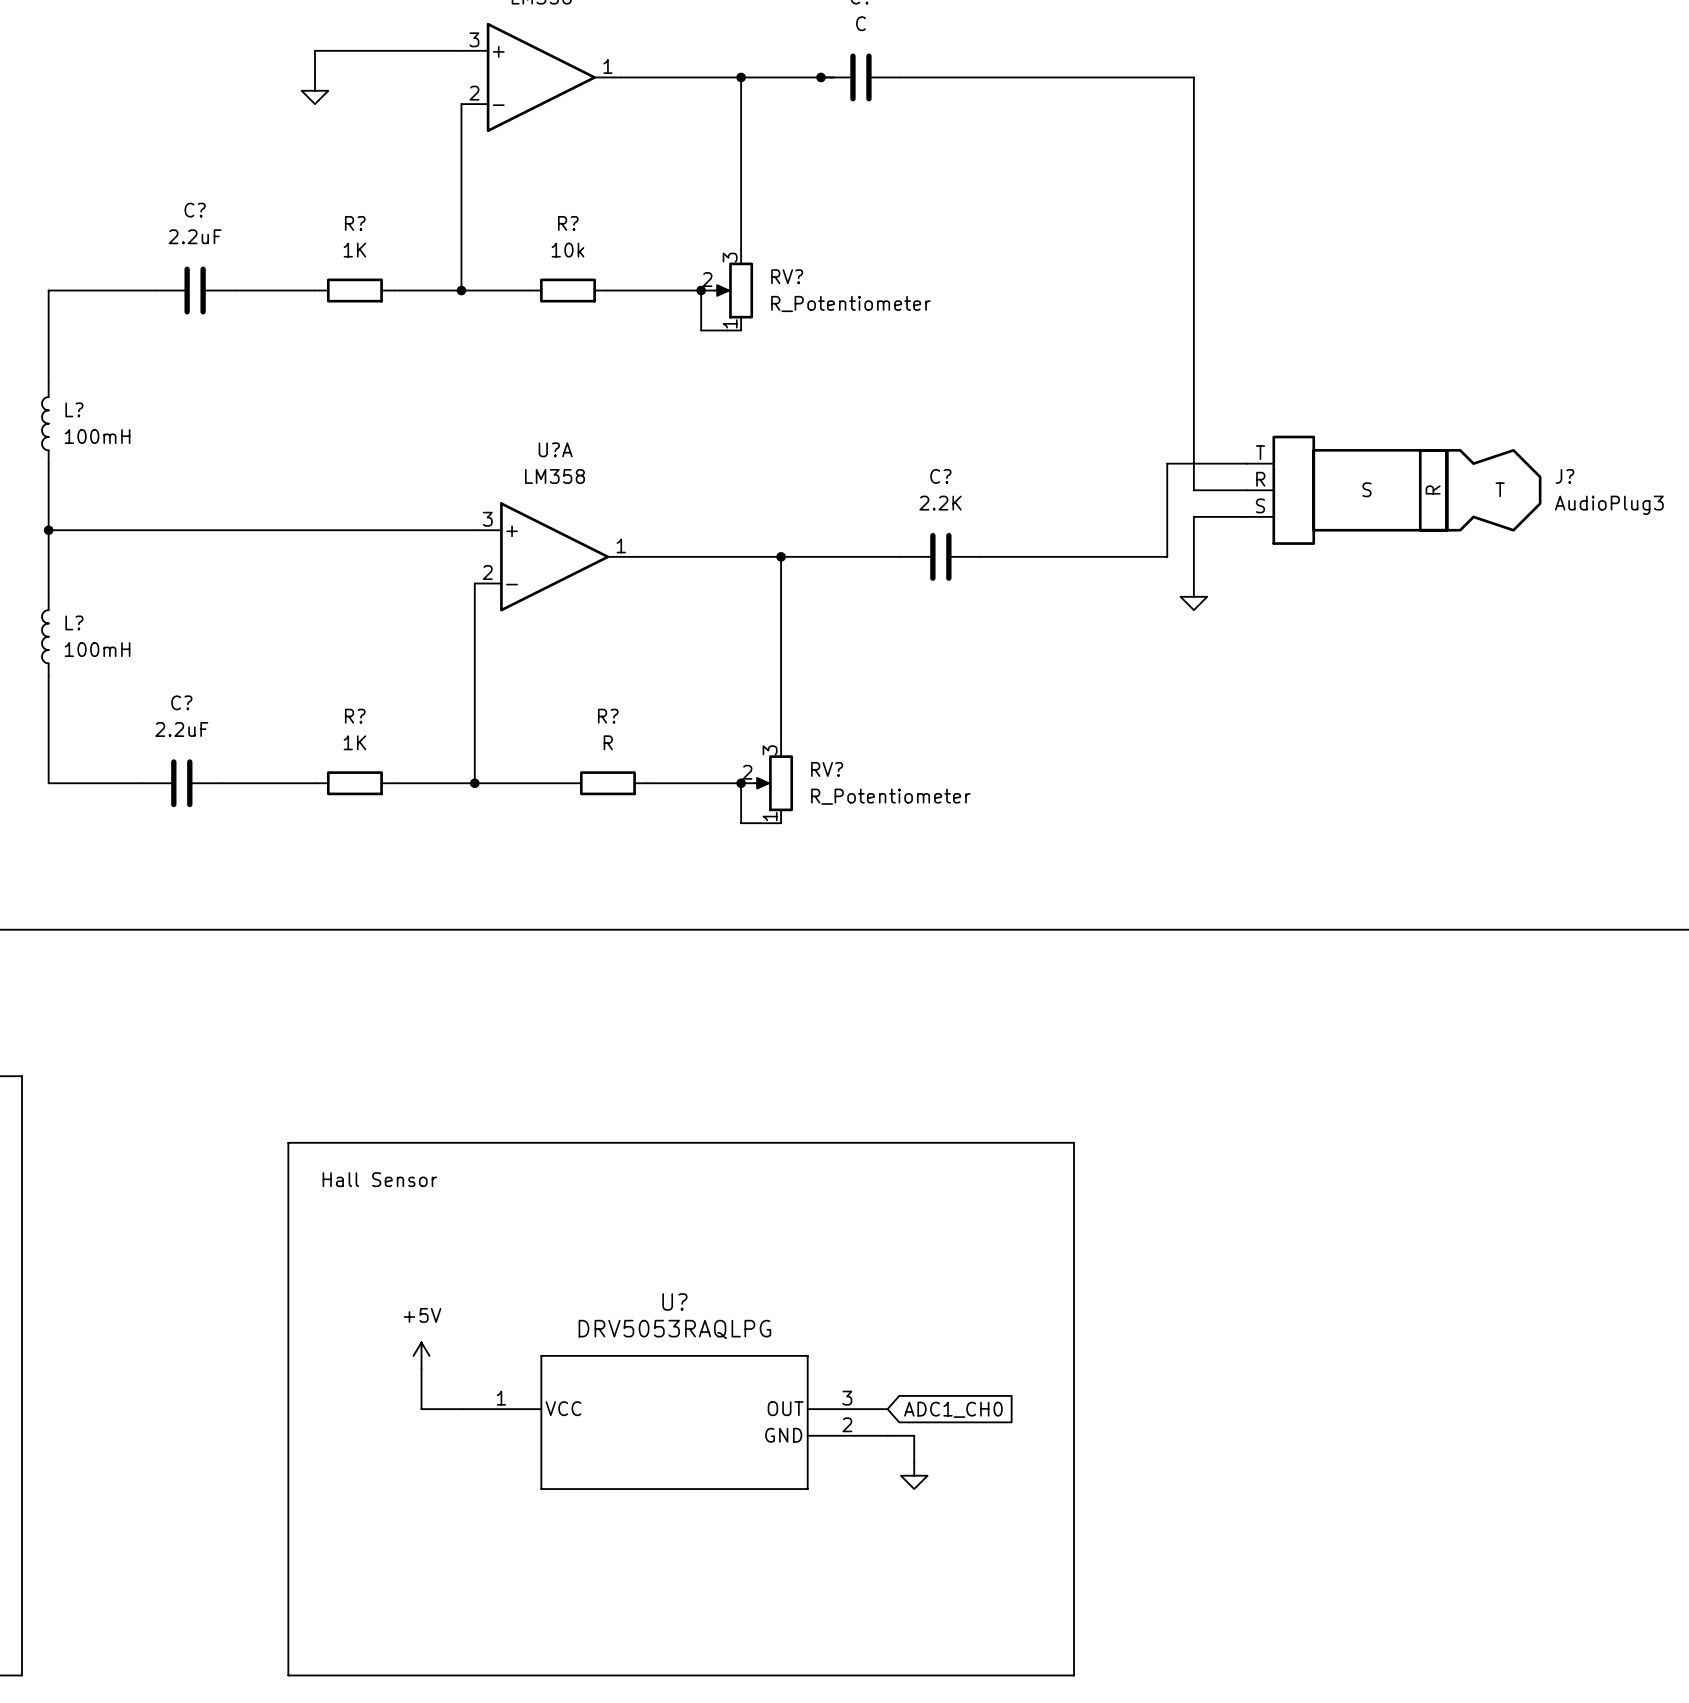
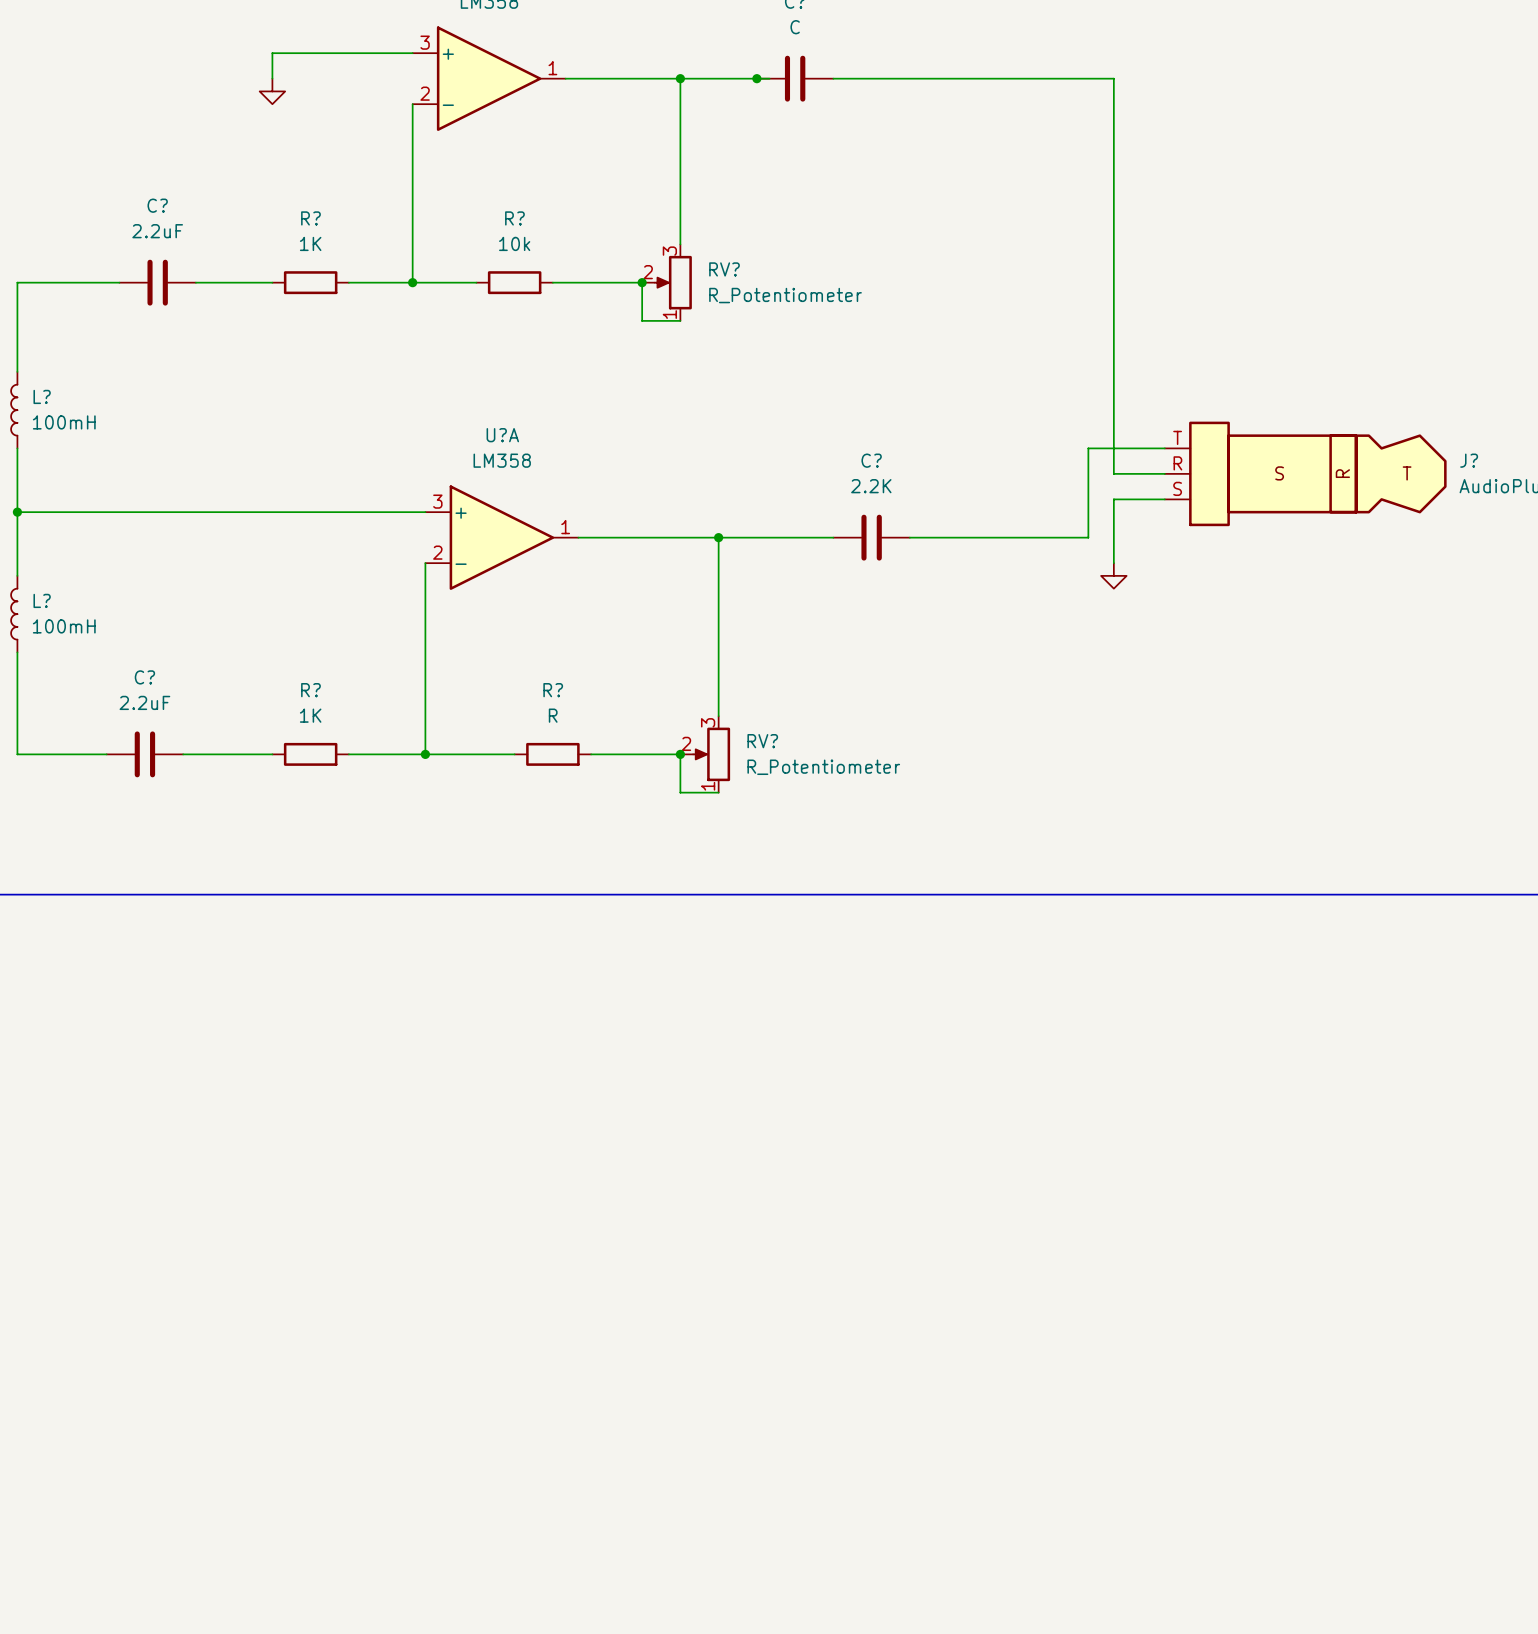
line: (288, 1142) (1074, 1142) (1074, 1675) (288, 1675) (288, 1142) -> none
text: Hall Sensor (379, 1179) -> none
power symbol: +5V (421, 1355) -> none
wire: (421, 1369) (421, 1409) (461, 1409) -> none
global label: ADC1_CH0 (953, 1409) -> none
U?: DRV5053RAQLPG (674, 1422) -> none
wire: (887, 1435) (914, 1435) (914, 1462) -> none
power symbol: (914, 1475) -> none

